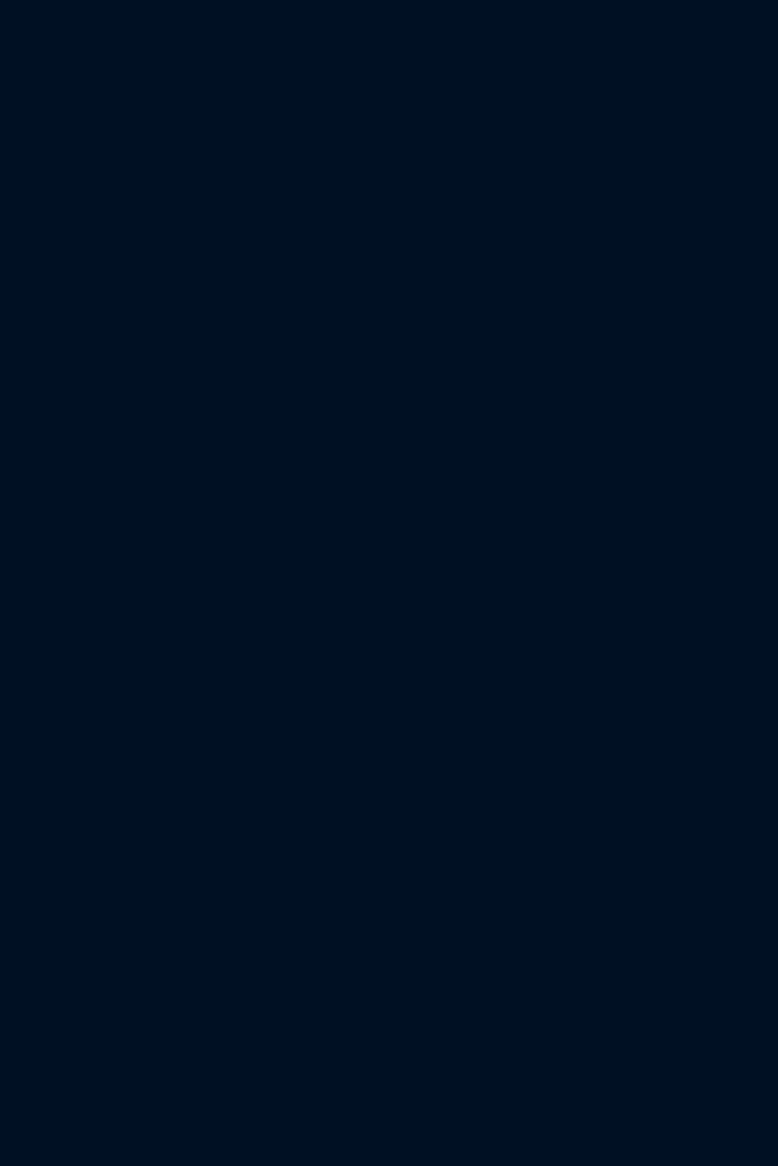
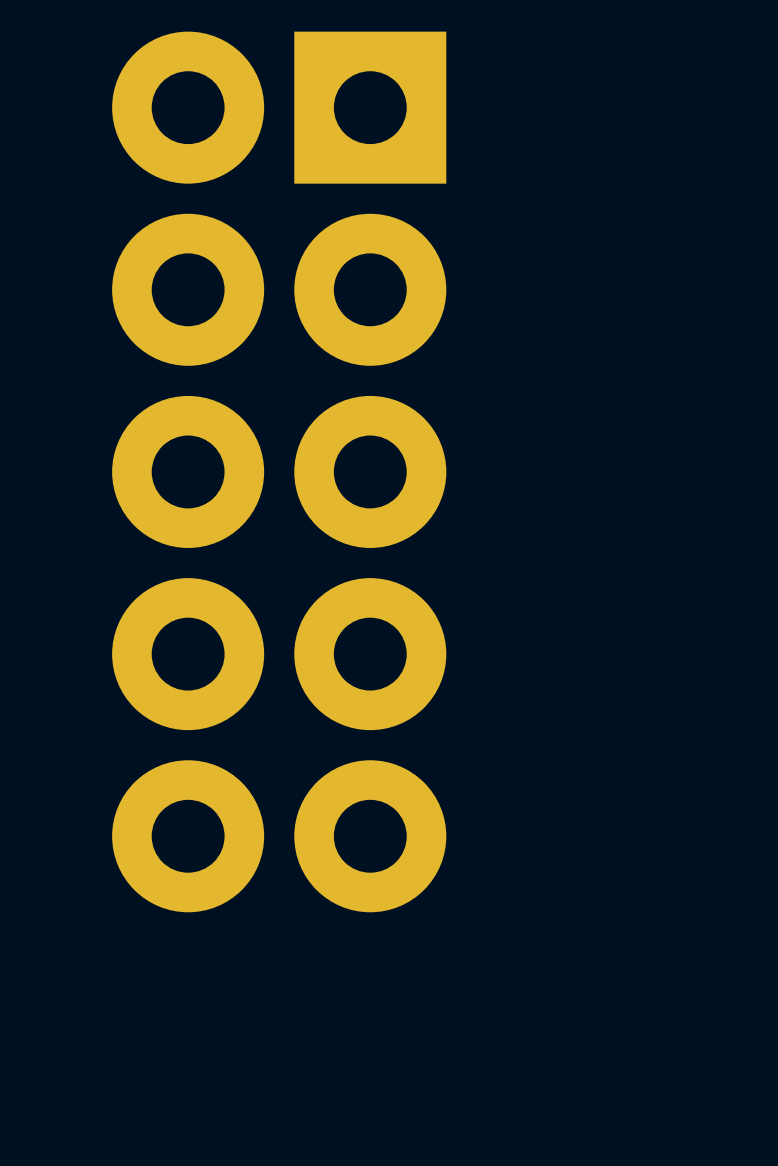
part: none -> (279, 471)

